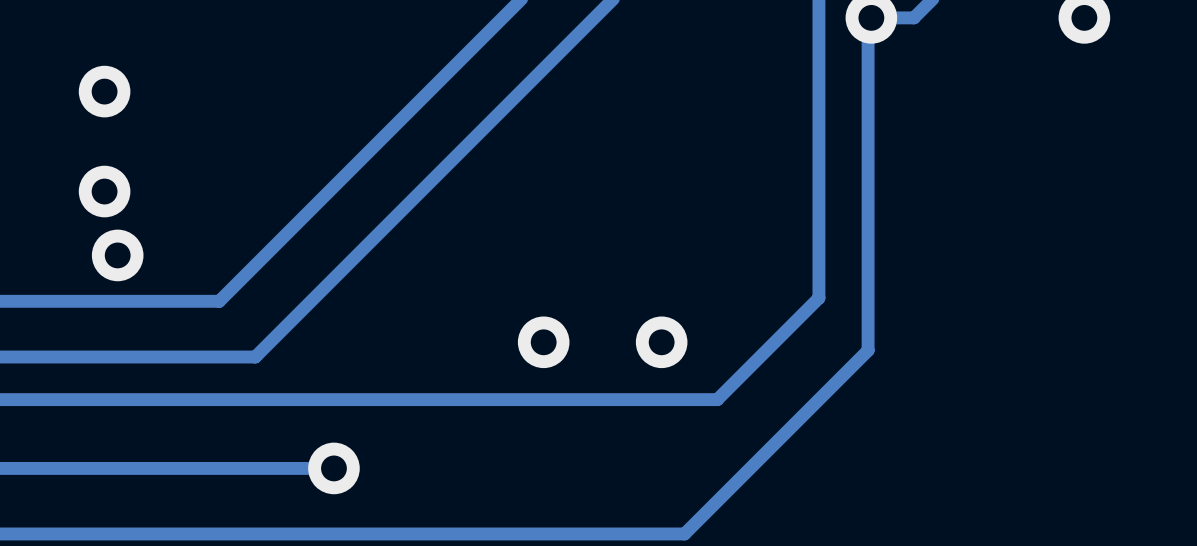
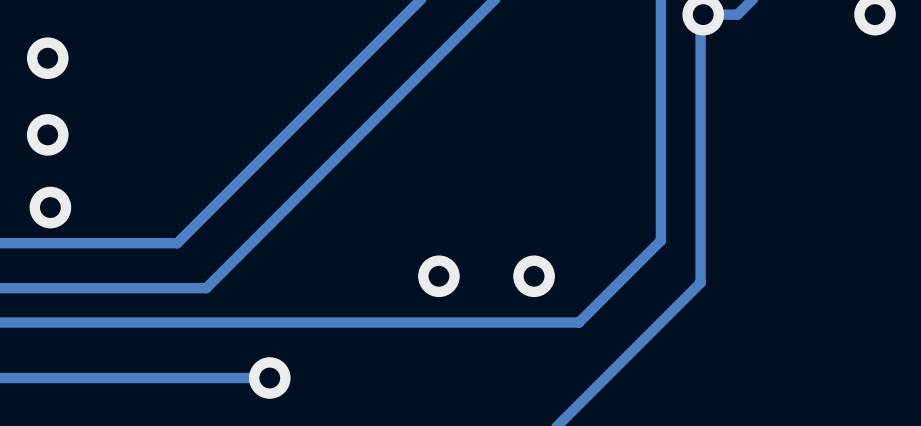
via position: (104, 91) -> (47, 58)
via position: (104, 191) -> (47, 134)
via: (117, 255) -> none
via: none -> (50, 207)

